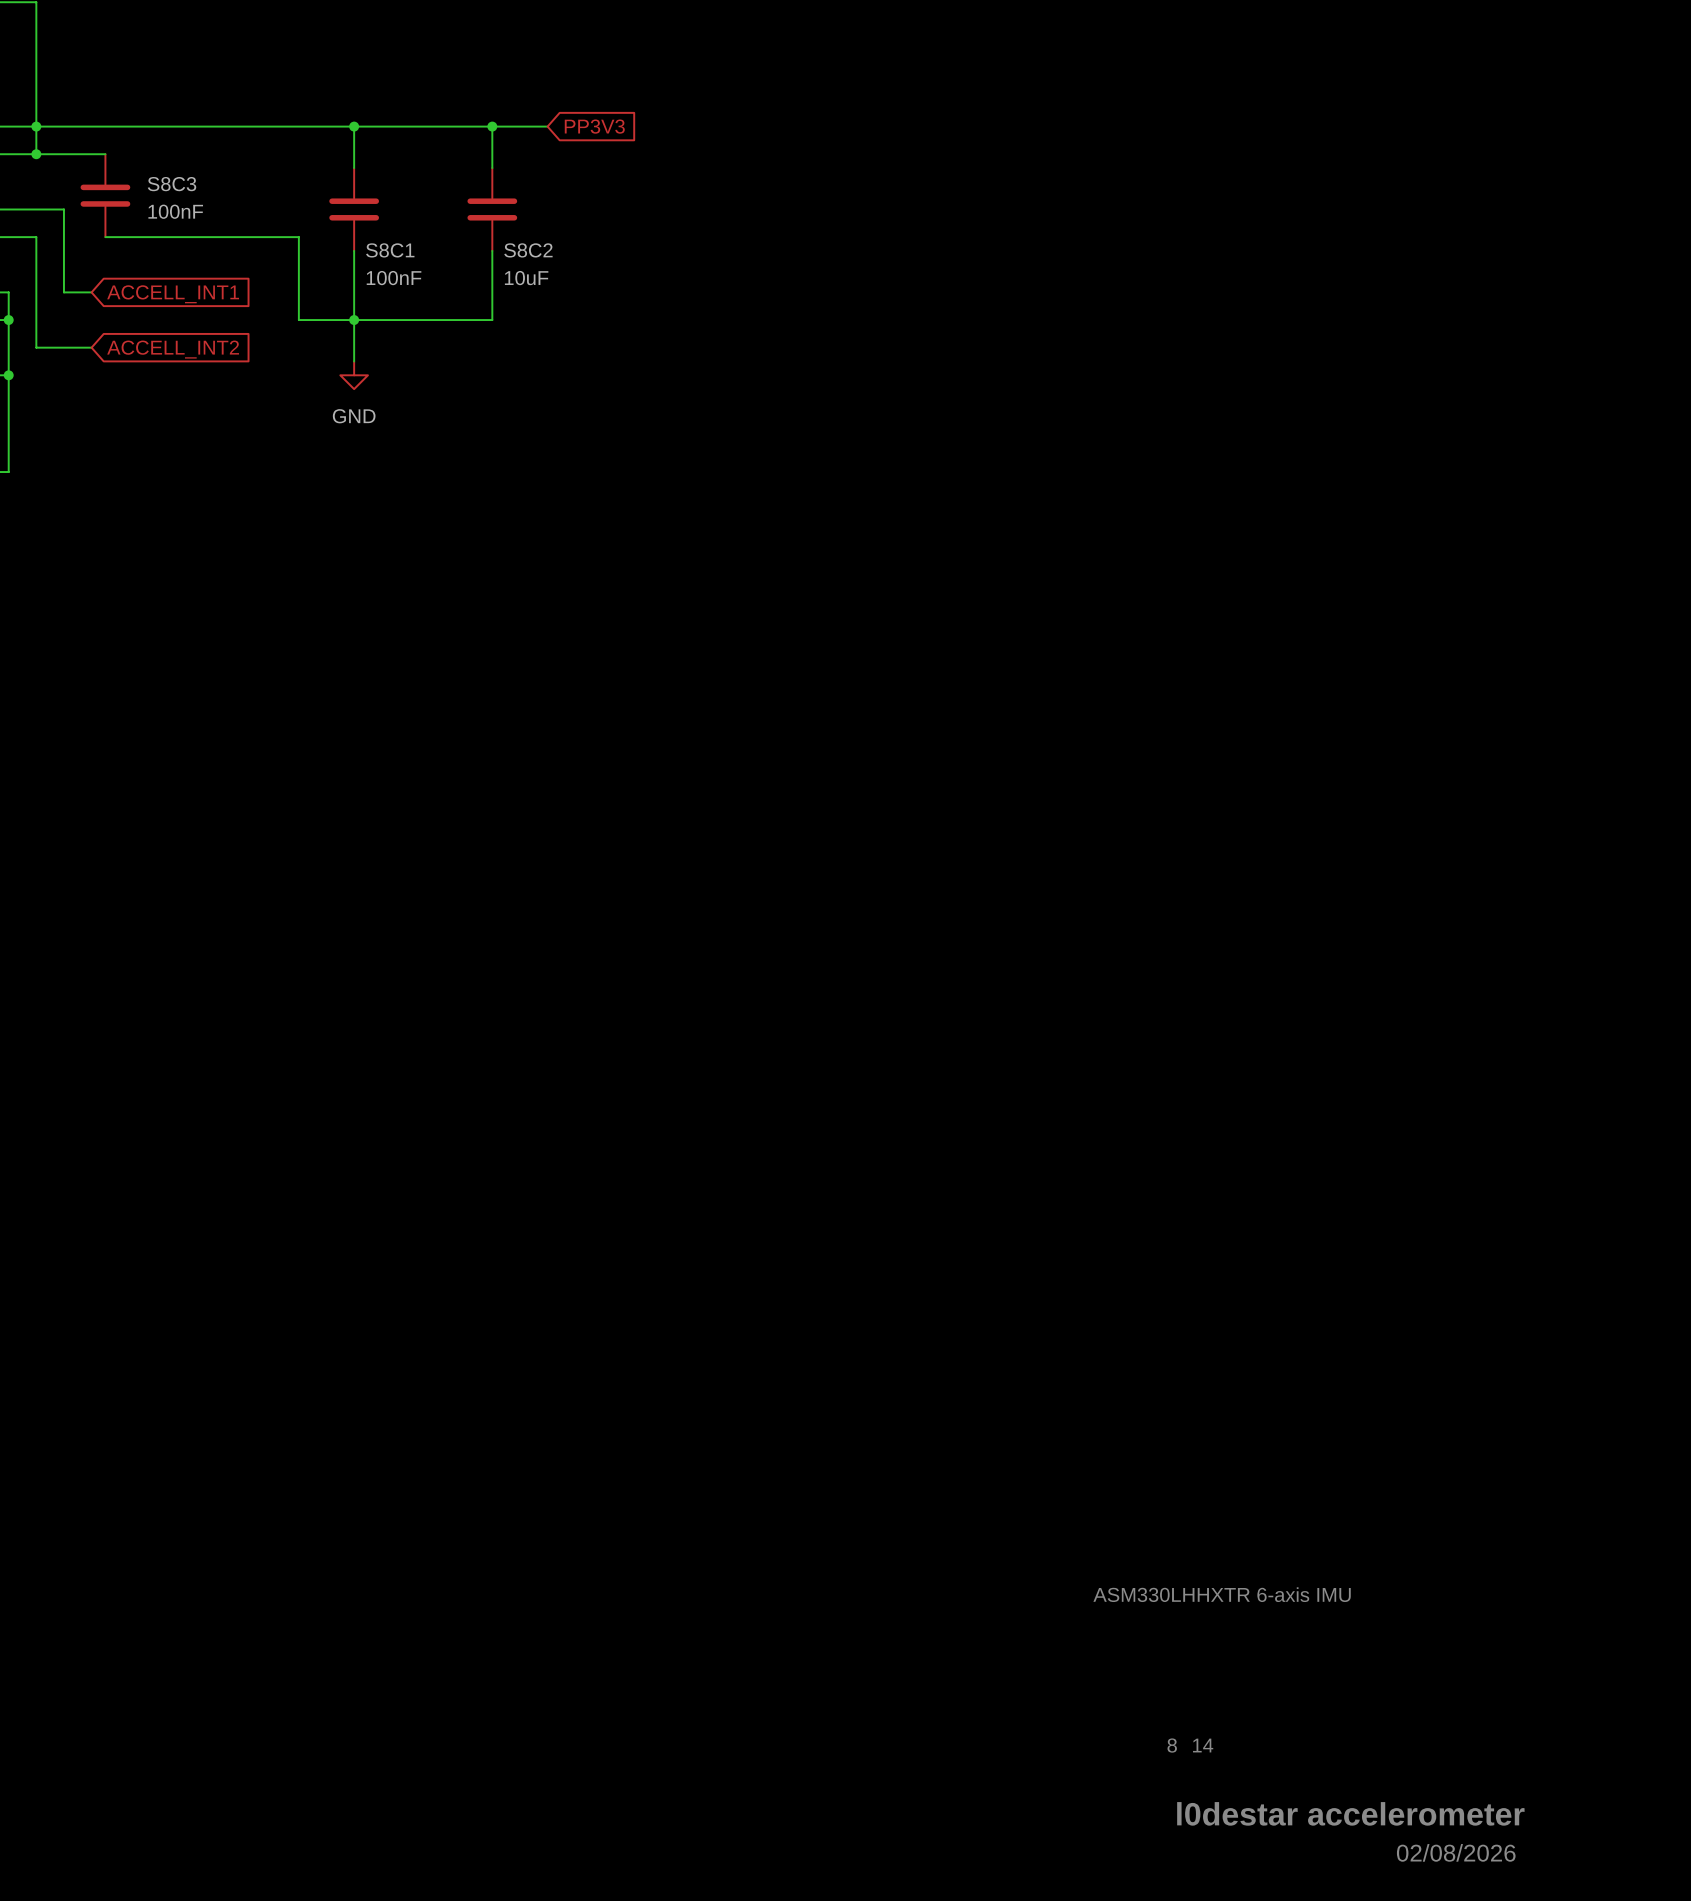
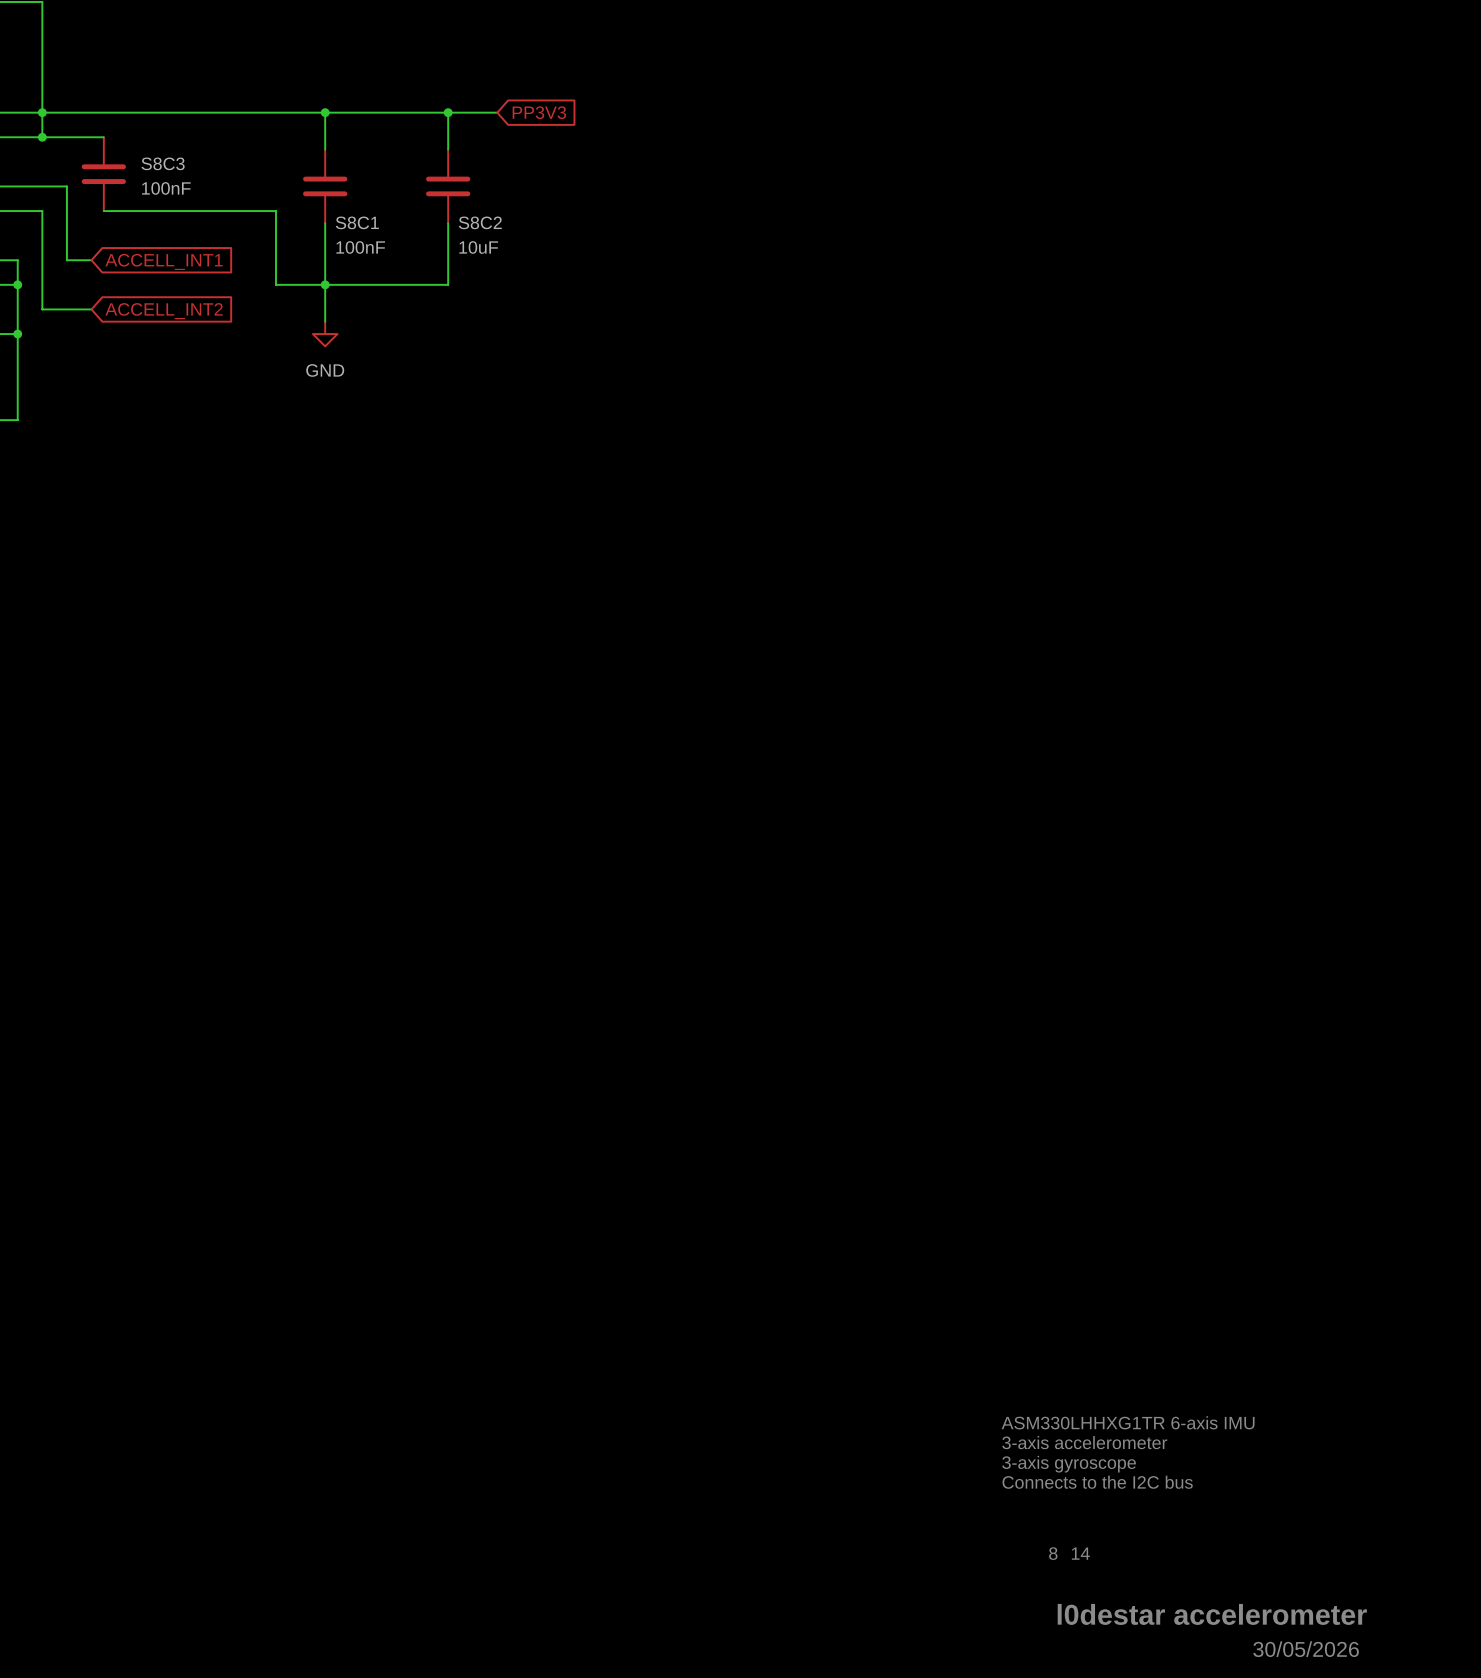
text: ASM330LHHXTR 6-axis IMU (1222, 1594) -> ASM330LHHXG1TR 6-axis IMU (1128, 1422)
text: none -> 3-axis accelerometer (1084, 1442)
text: none -> 3-axis gyroscope (1069, 1464)
text: none -> Connects to the I2C bus (1097, 1482)
text: 02/08/2026 (1456, 1852) -> 30/05/2026 (1306, 1649)

